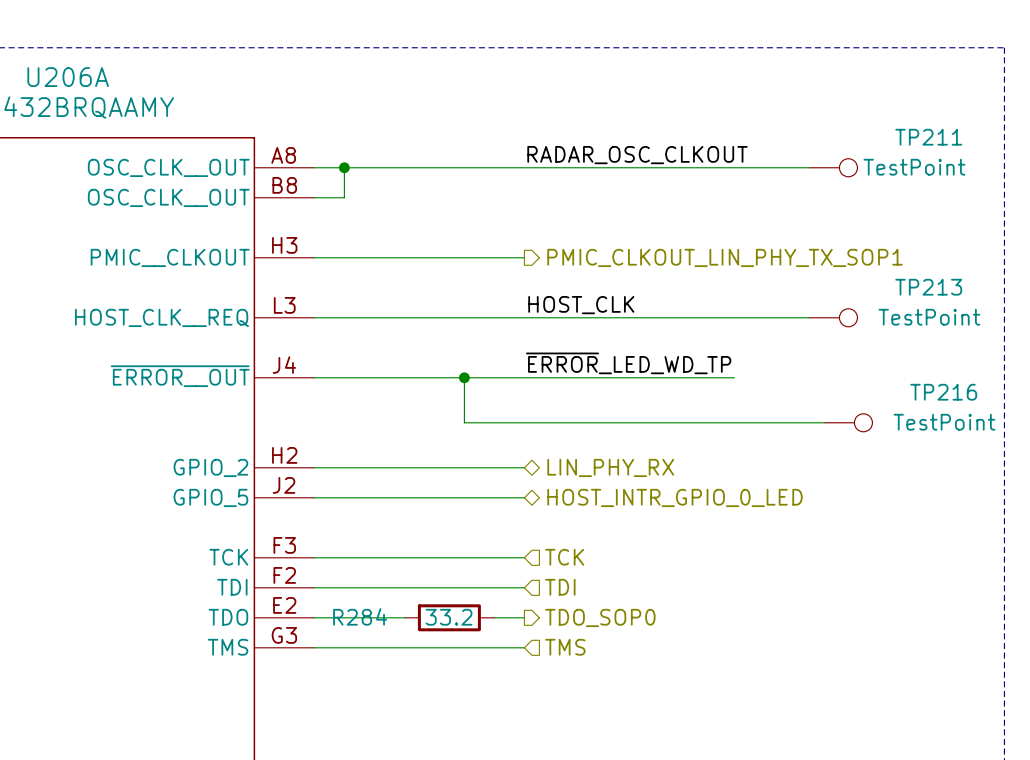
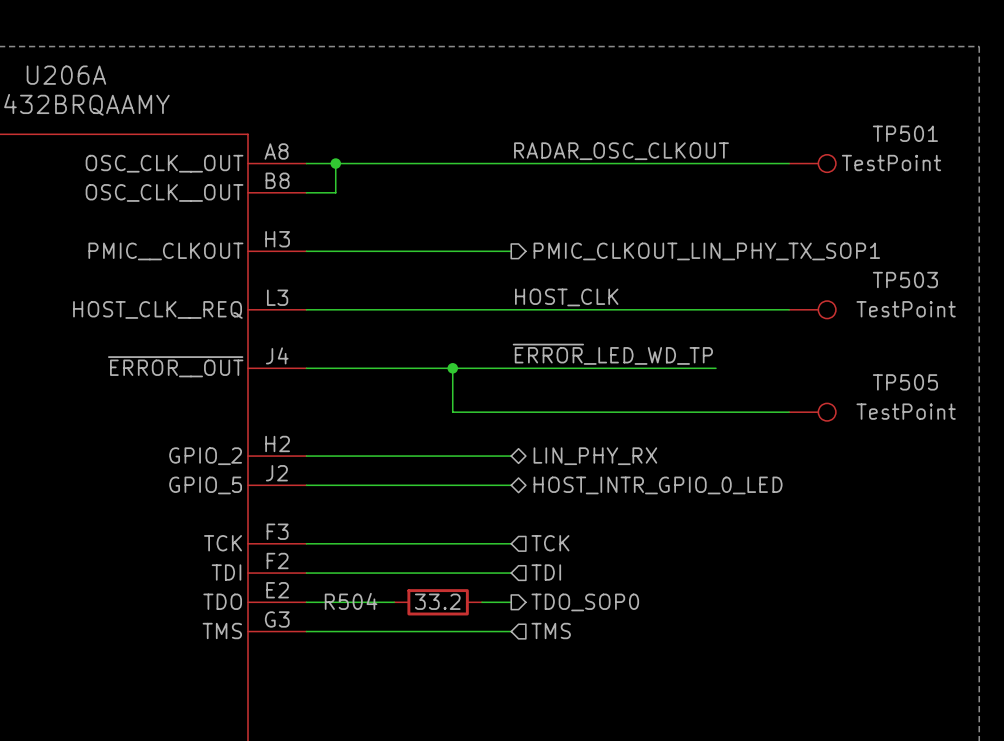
TP211 name: TP211 (928, 137) -> TP501 (905, 133)
TP213 name: TP213 (928, 287) -> TP503 (905, 280)
TP505: none -> TestPoint (812, 412)
TP216: TestPoint (848, 422) -> none
R284 name: R284 (360, 616) -> R504 (351, 601)

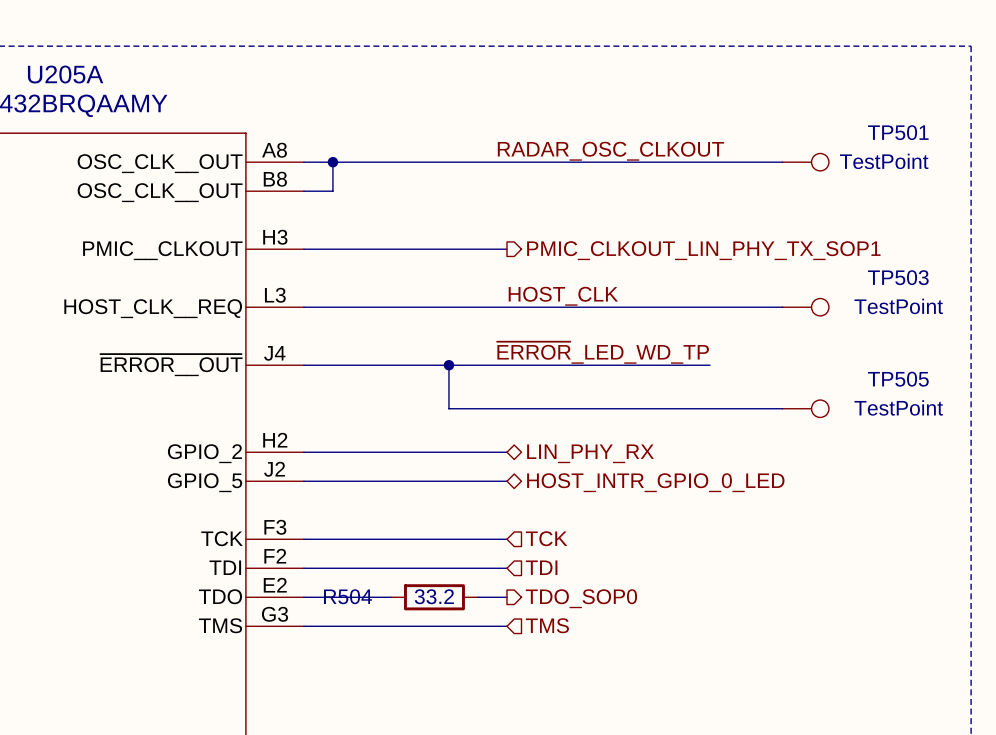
U206A name: U206A (66, 75) -> U205A (65, 74)

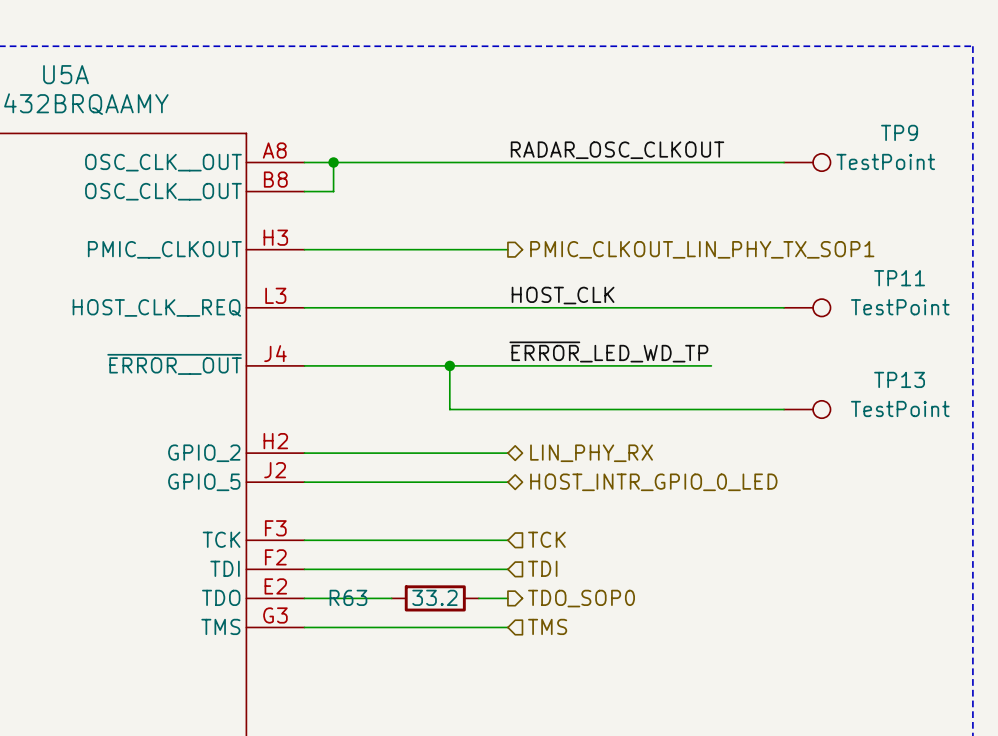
U205A name: U205A (65, 74) -> U5A (66, 74)
TP501 name: TP501 (898, 132) -> TP9 (899, 132)
TP503 name: TP503 (898, 277) -> TP11 (899, 278)
TP505 name: TP505 (898, 379) -> TP13 (899, 379)
R504 name: R504 (348, 596) -> R63 (348, 597)

